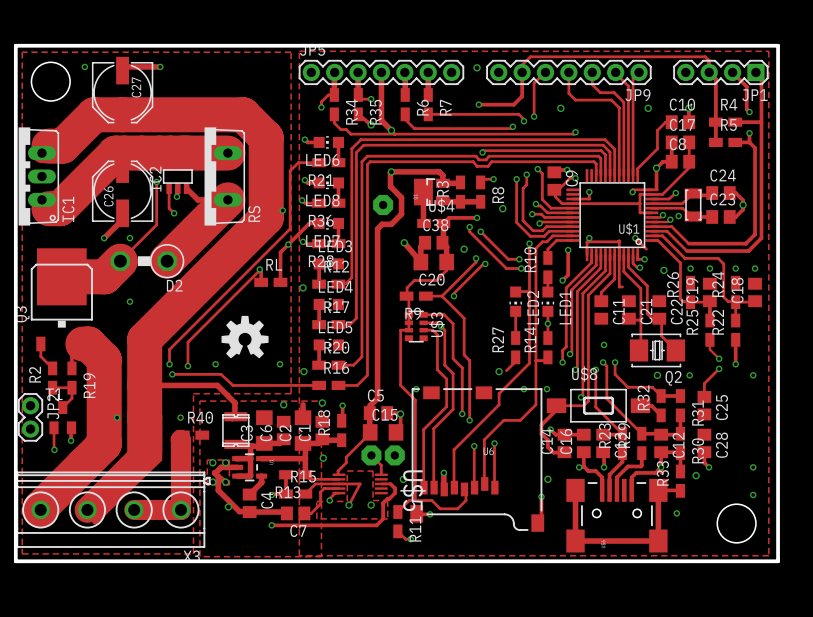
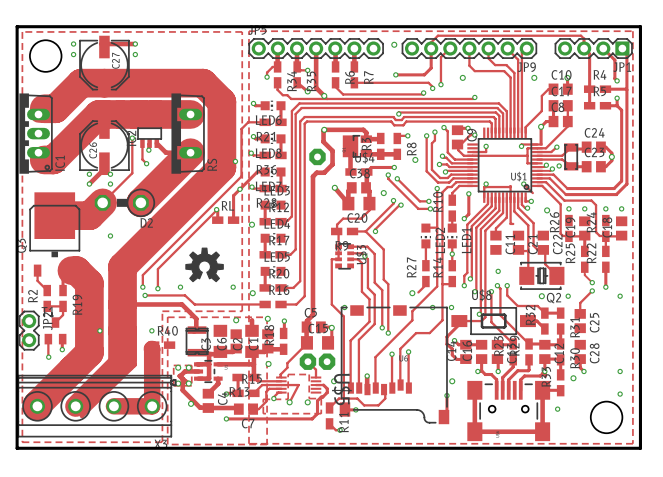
via: none -> (73, 54)
via: none -> (135, 54)
via: none -> (89, 174)
via: none -> (110, 174)

